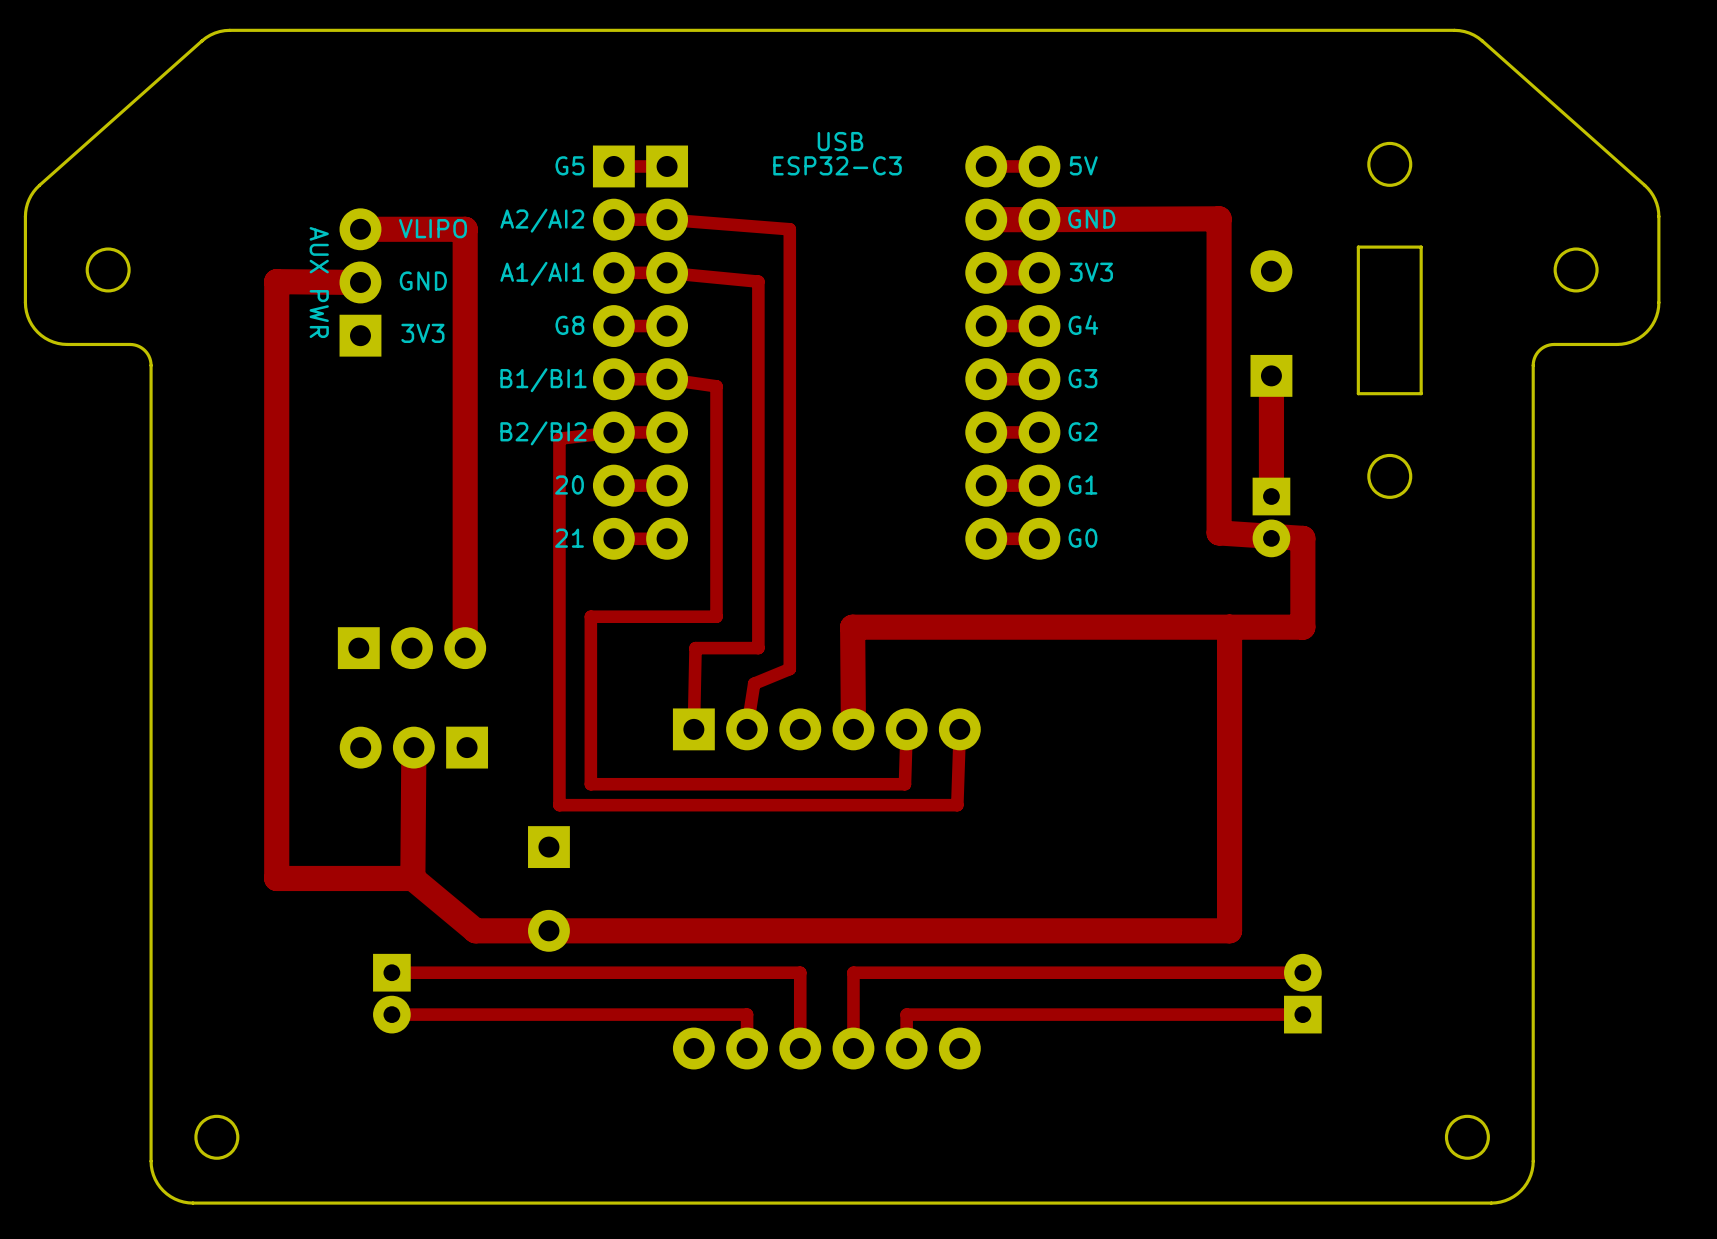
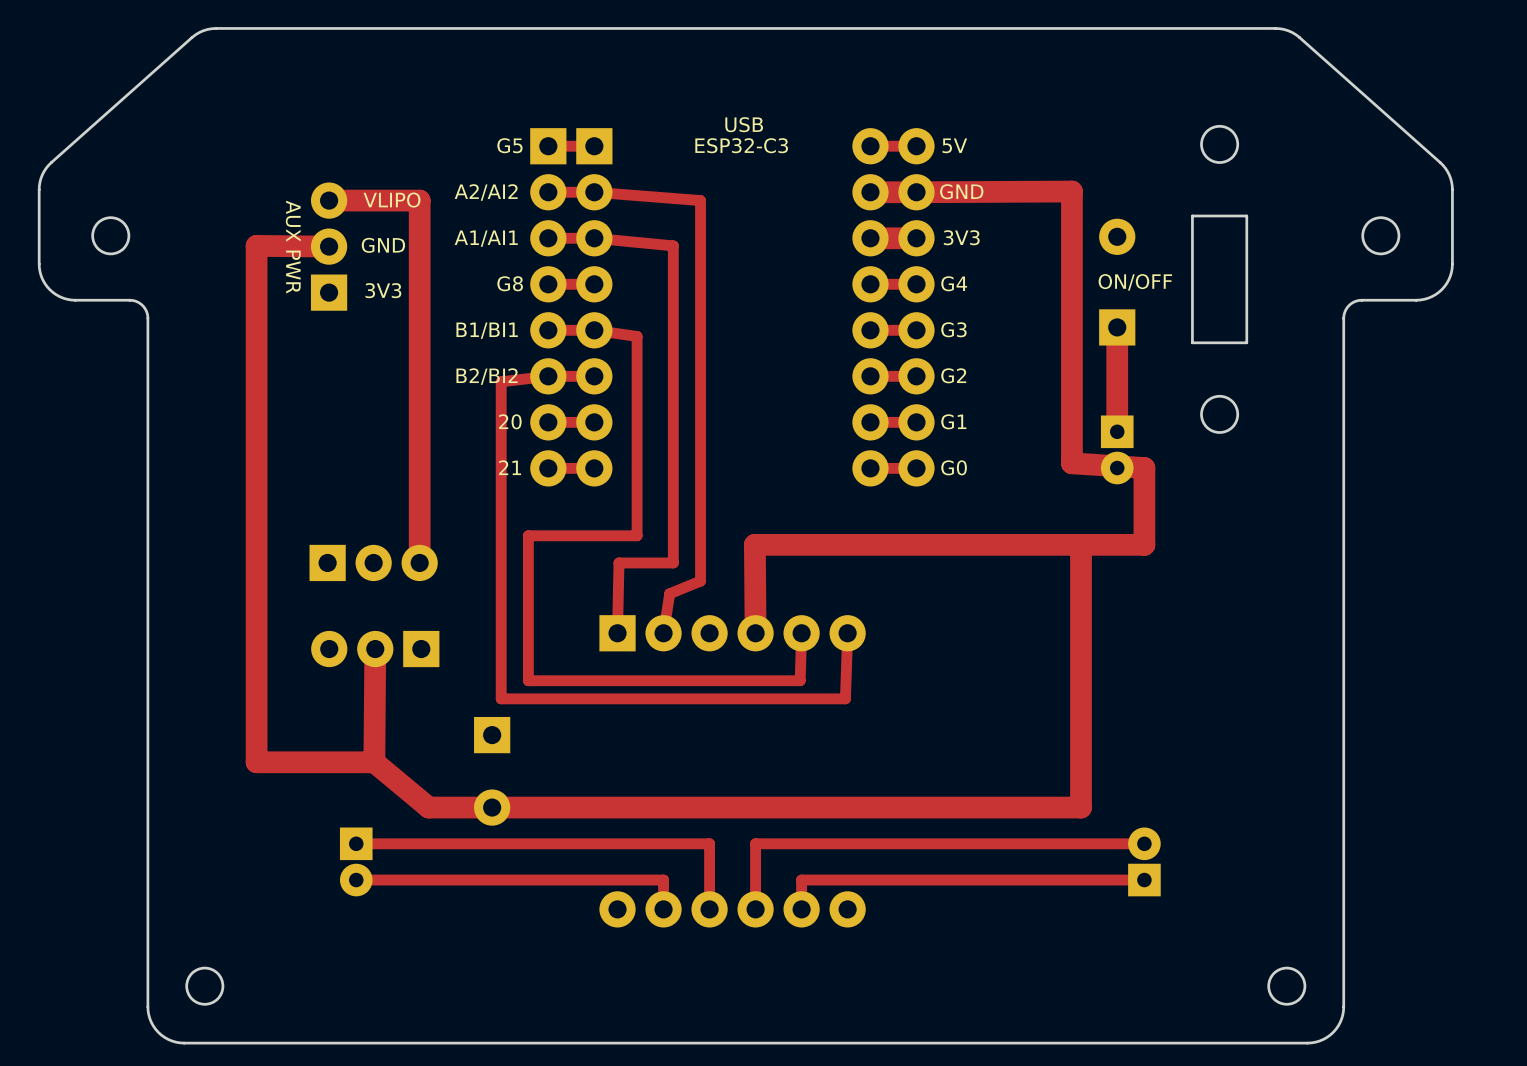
text: none -> ON/OFF (1135, 282)

